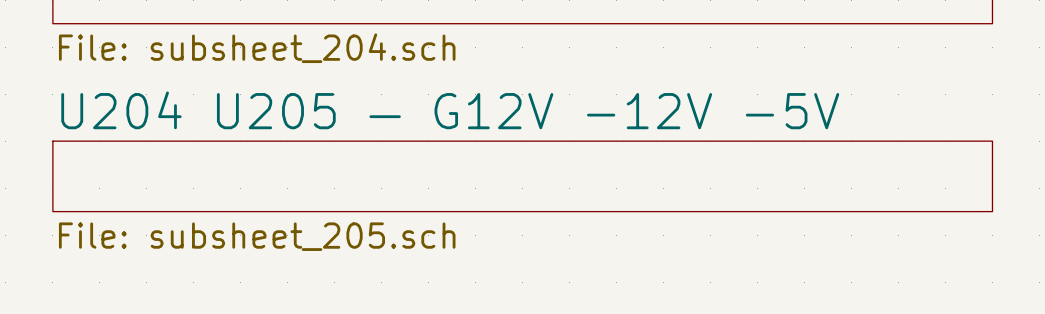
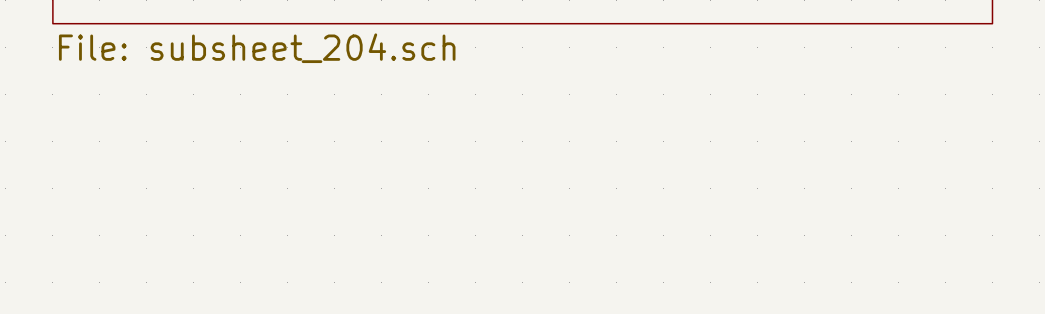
sheet U204 U205 — G12V -12V -5V: File: subsheet_205.sch (522, 176) -> none

